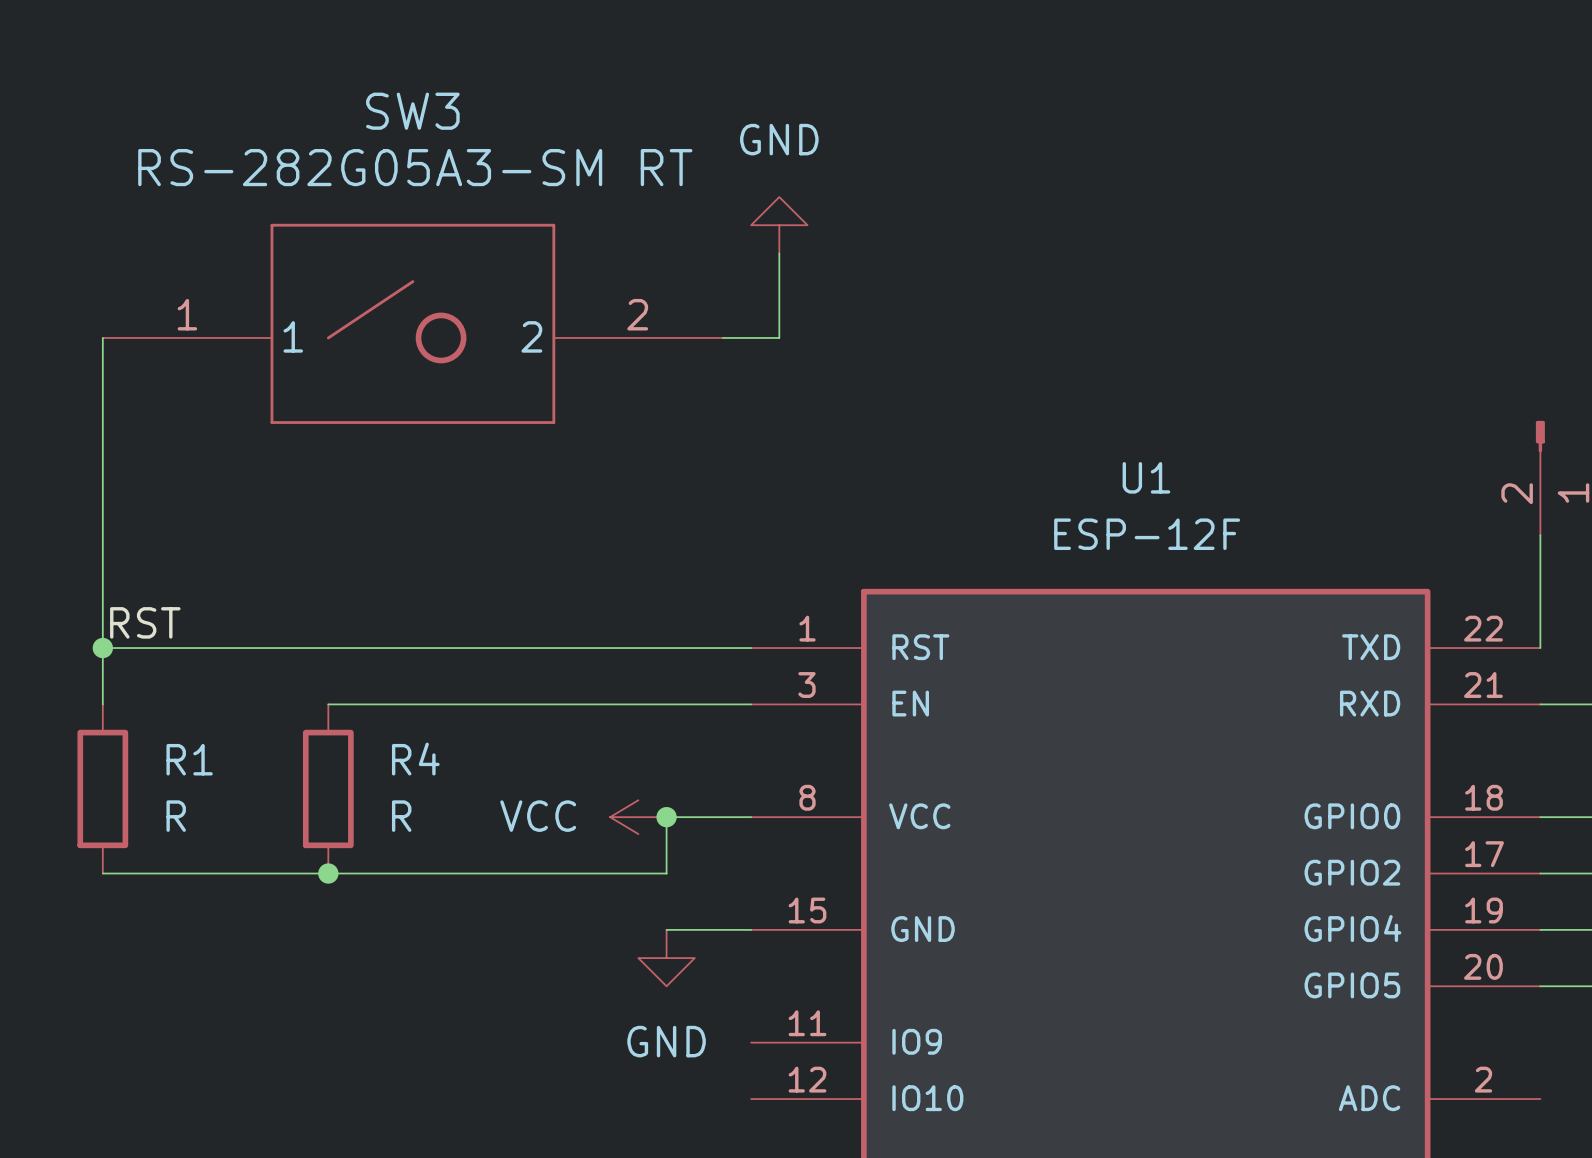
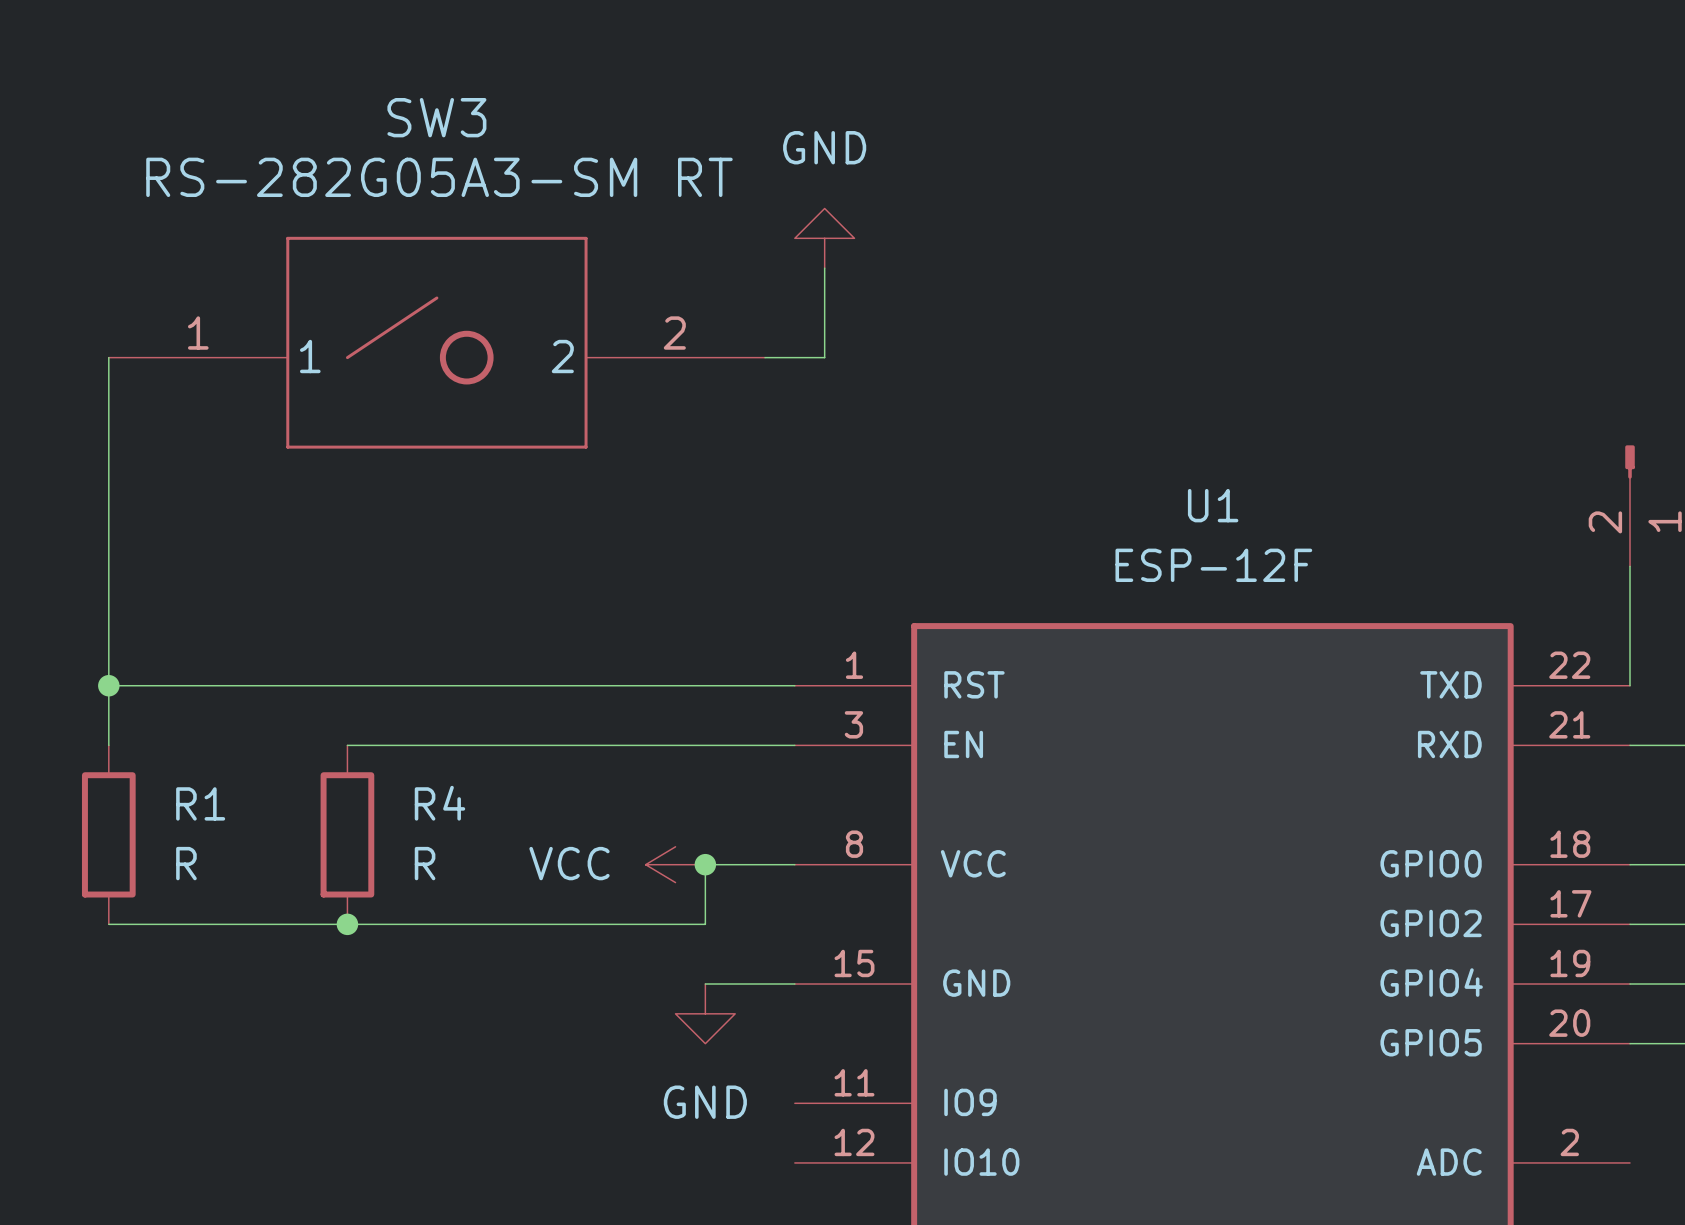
label: RST (145, 622) -> none

